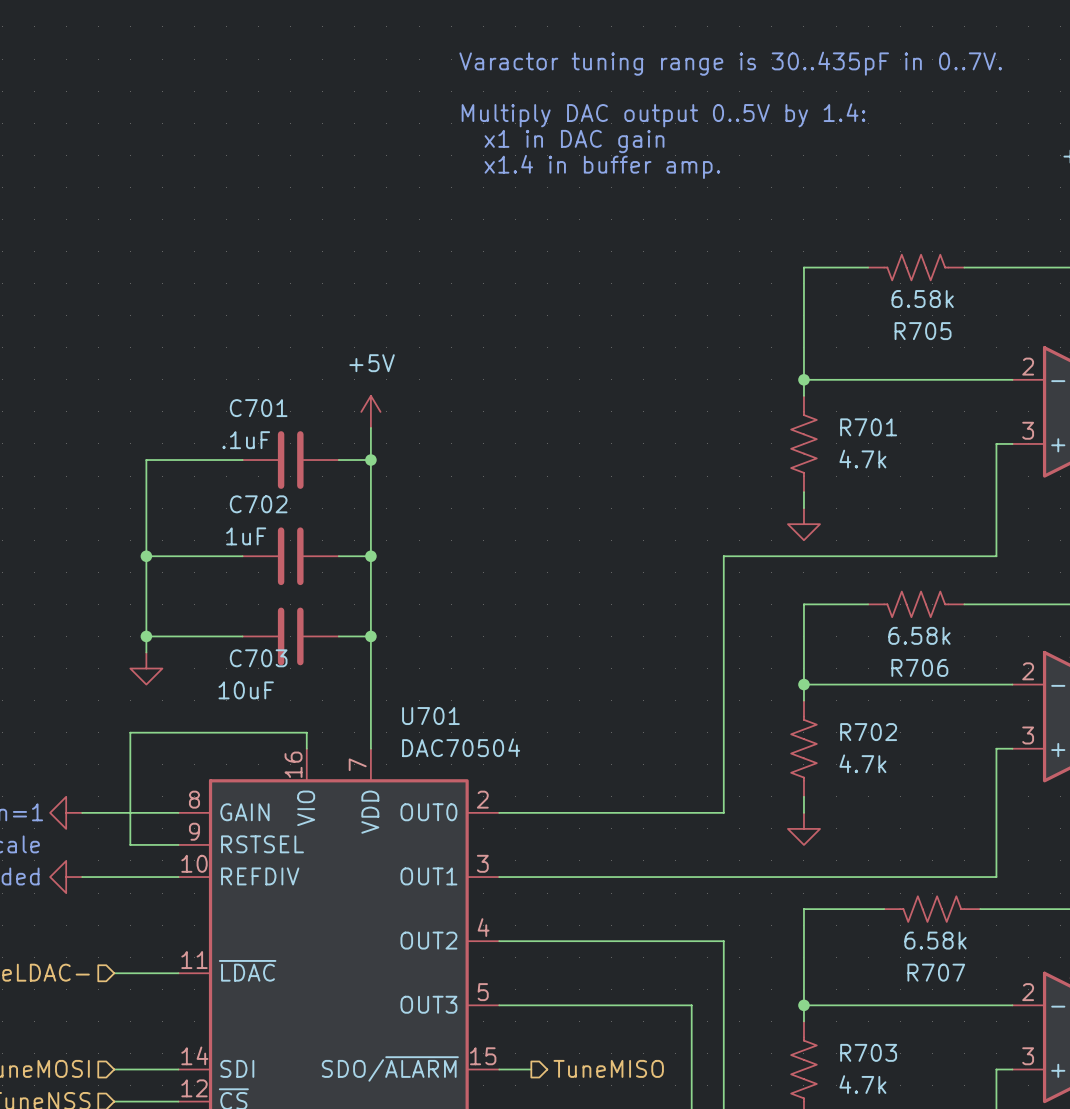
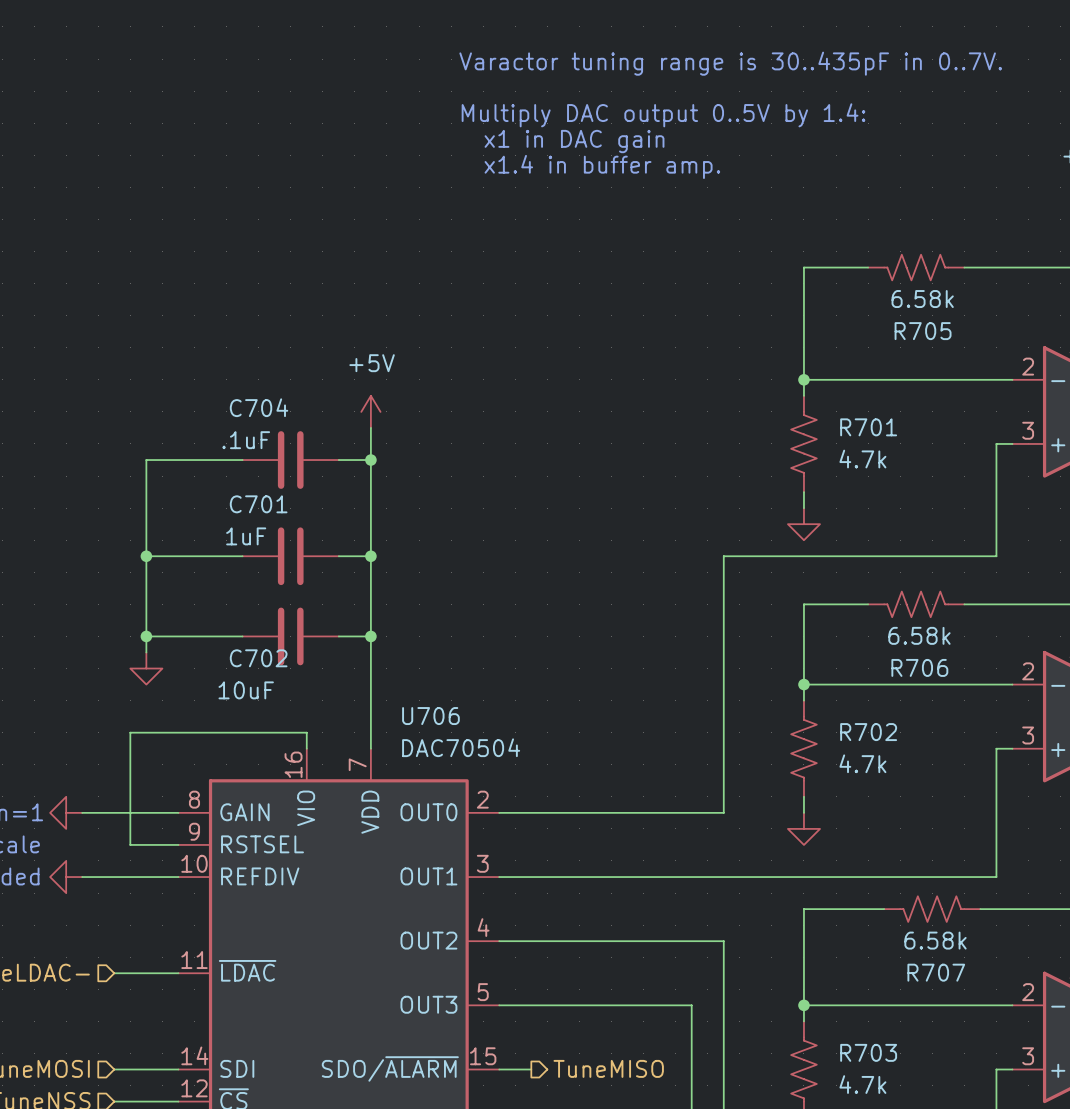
C701 name: C701 (258, 408) -> C704 (259, 407)
C702 name: C702 (258, 504) -> C701 (258, 504)
C703 name: C703 (258, 658) -> C702 (258, 658)
U701 name: U701 (430, 716) -> U706 (430, 716)

